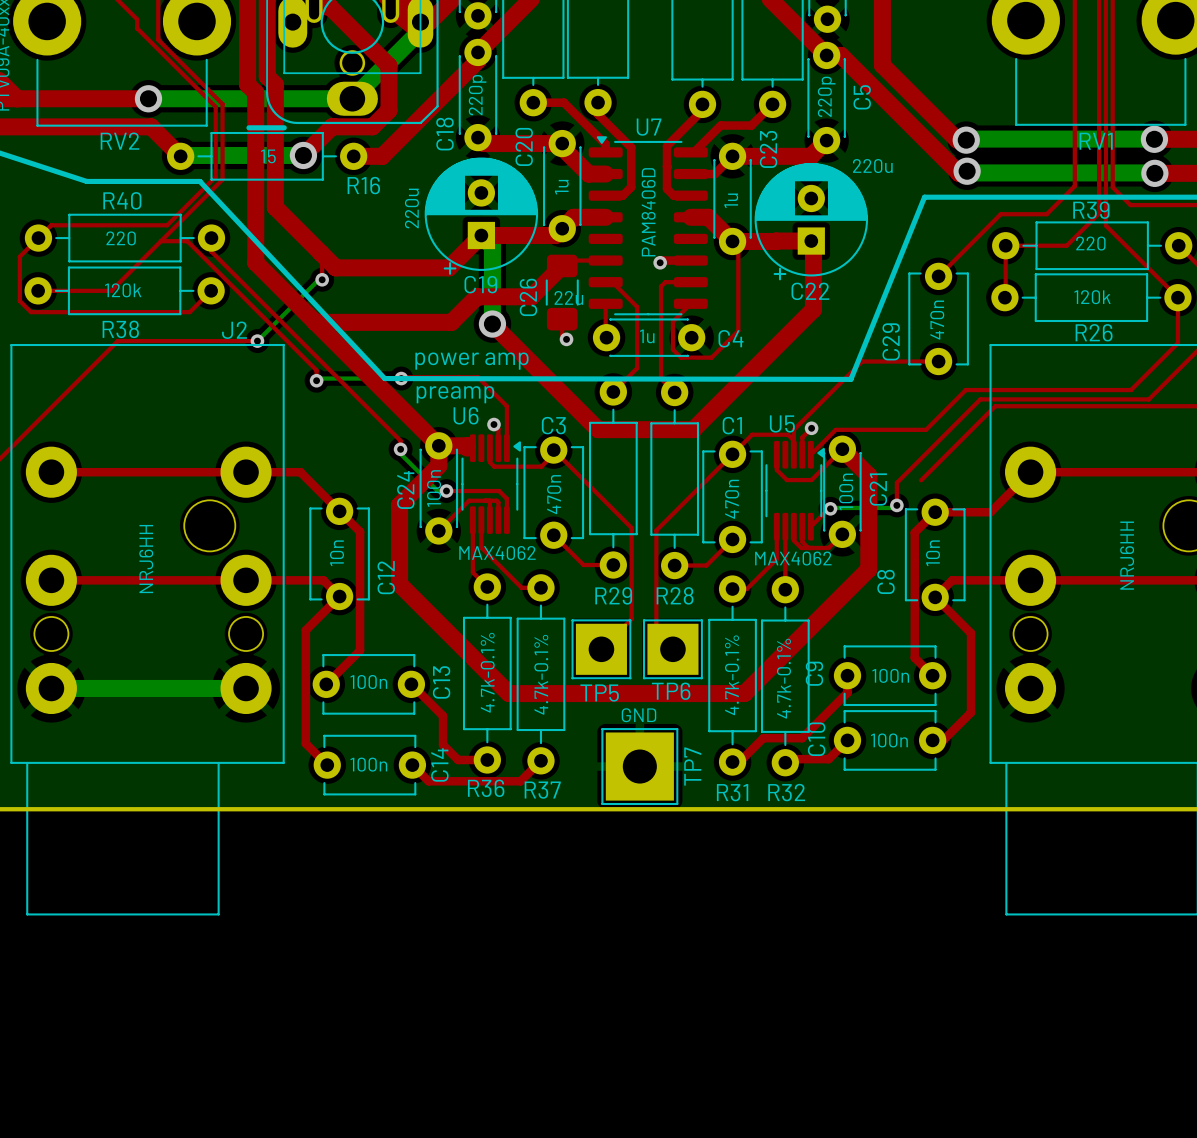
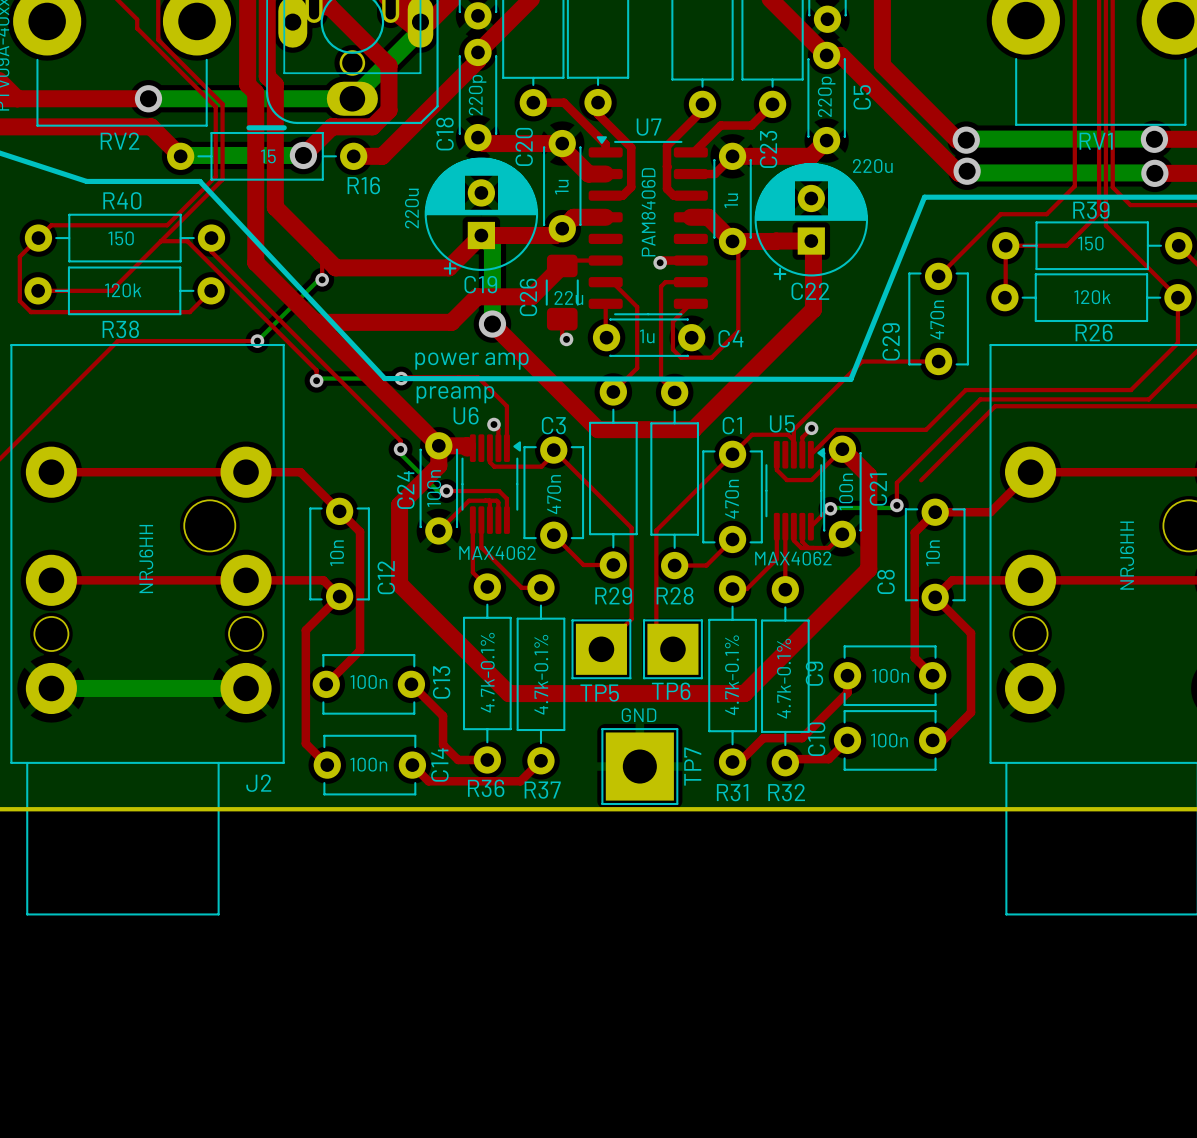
R40 value: 220 (121, 238) -> 150 (121, 238)
R39 value: 220 (1090, 243) -> 150 (1090, 243)
J2 name position: J2 (234, 330) -> J2 (258, 783)

